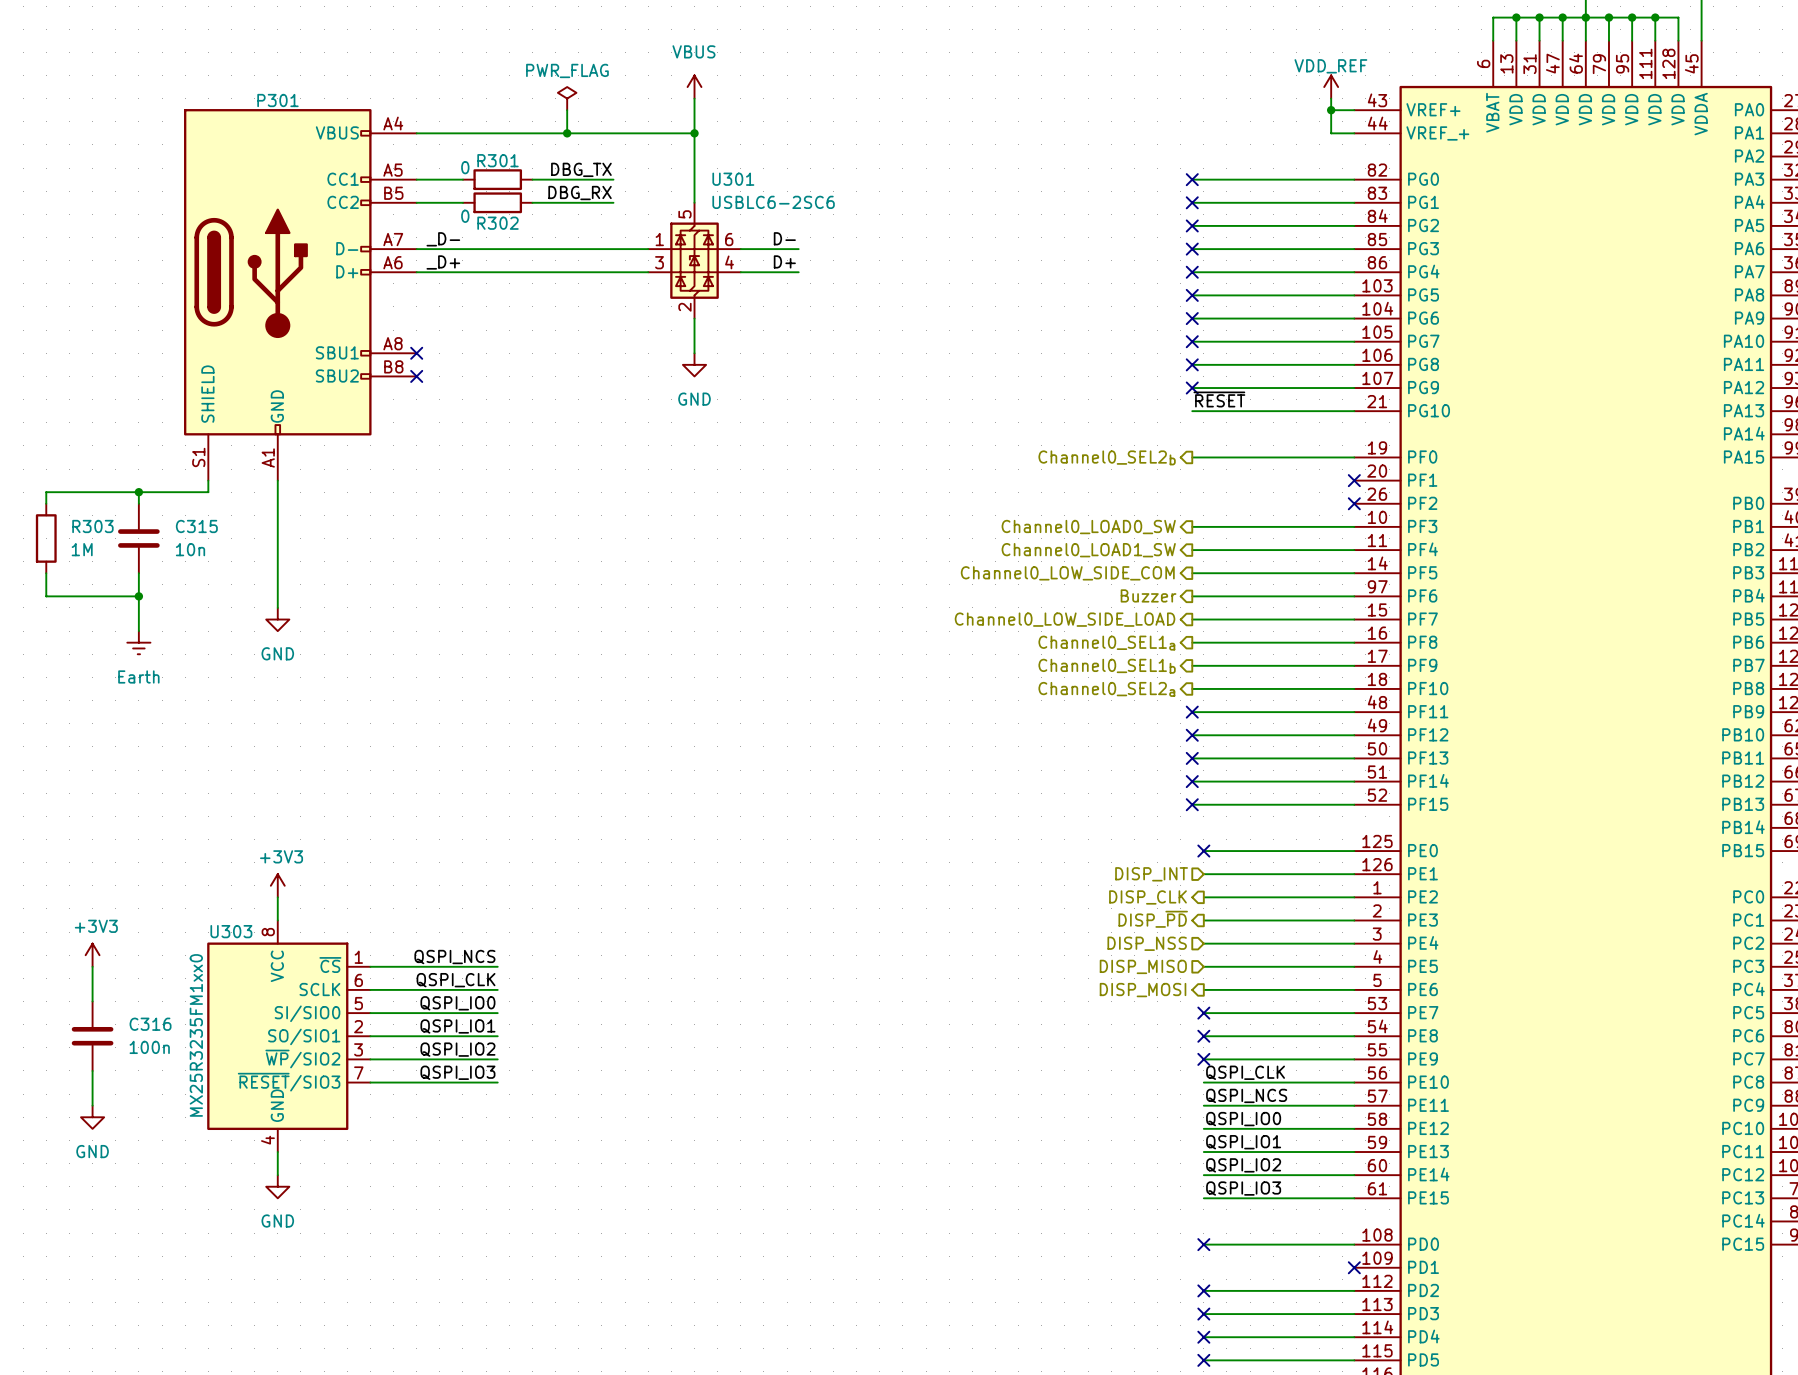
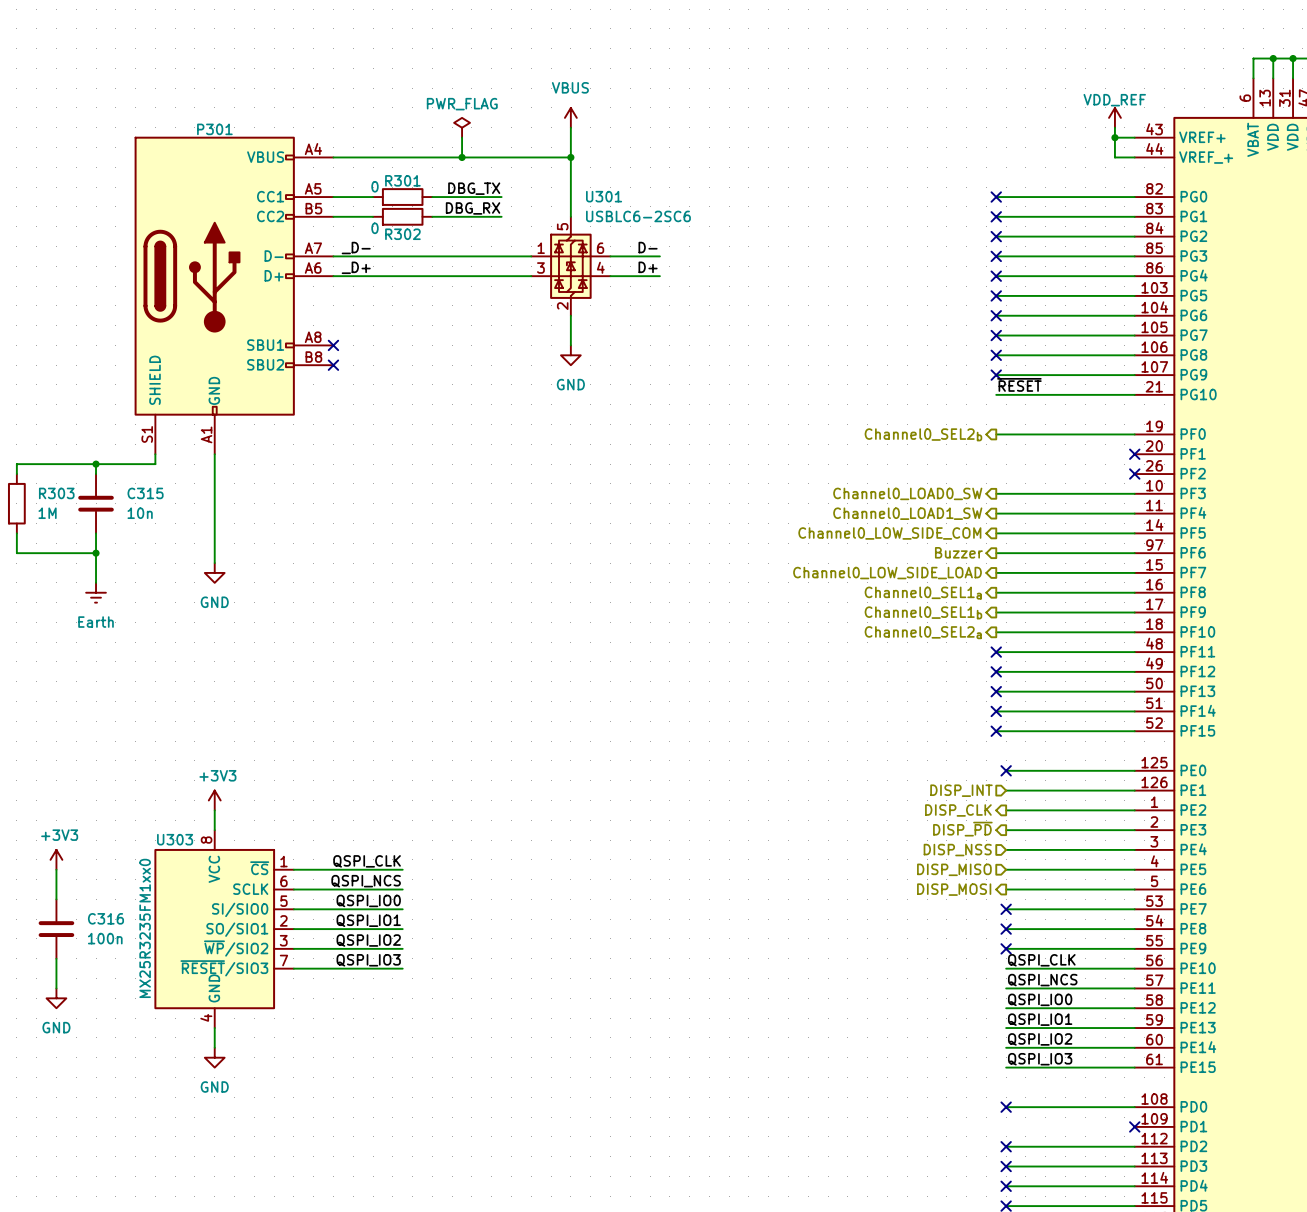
label: QSPI_NCS (454, 957) -> QSPI_CLK (367, 861)
label: QSPI_CLK (456, 980) -> QSPI_NCS (366, 881)

